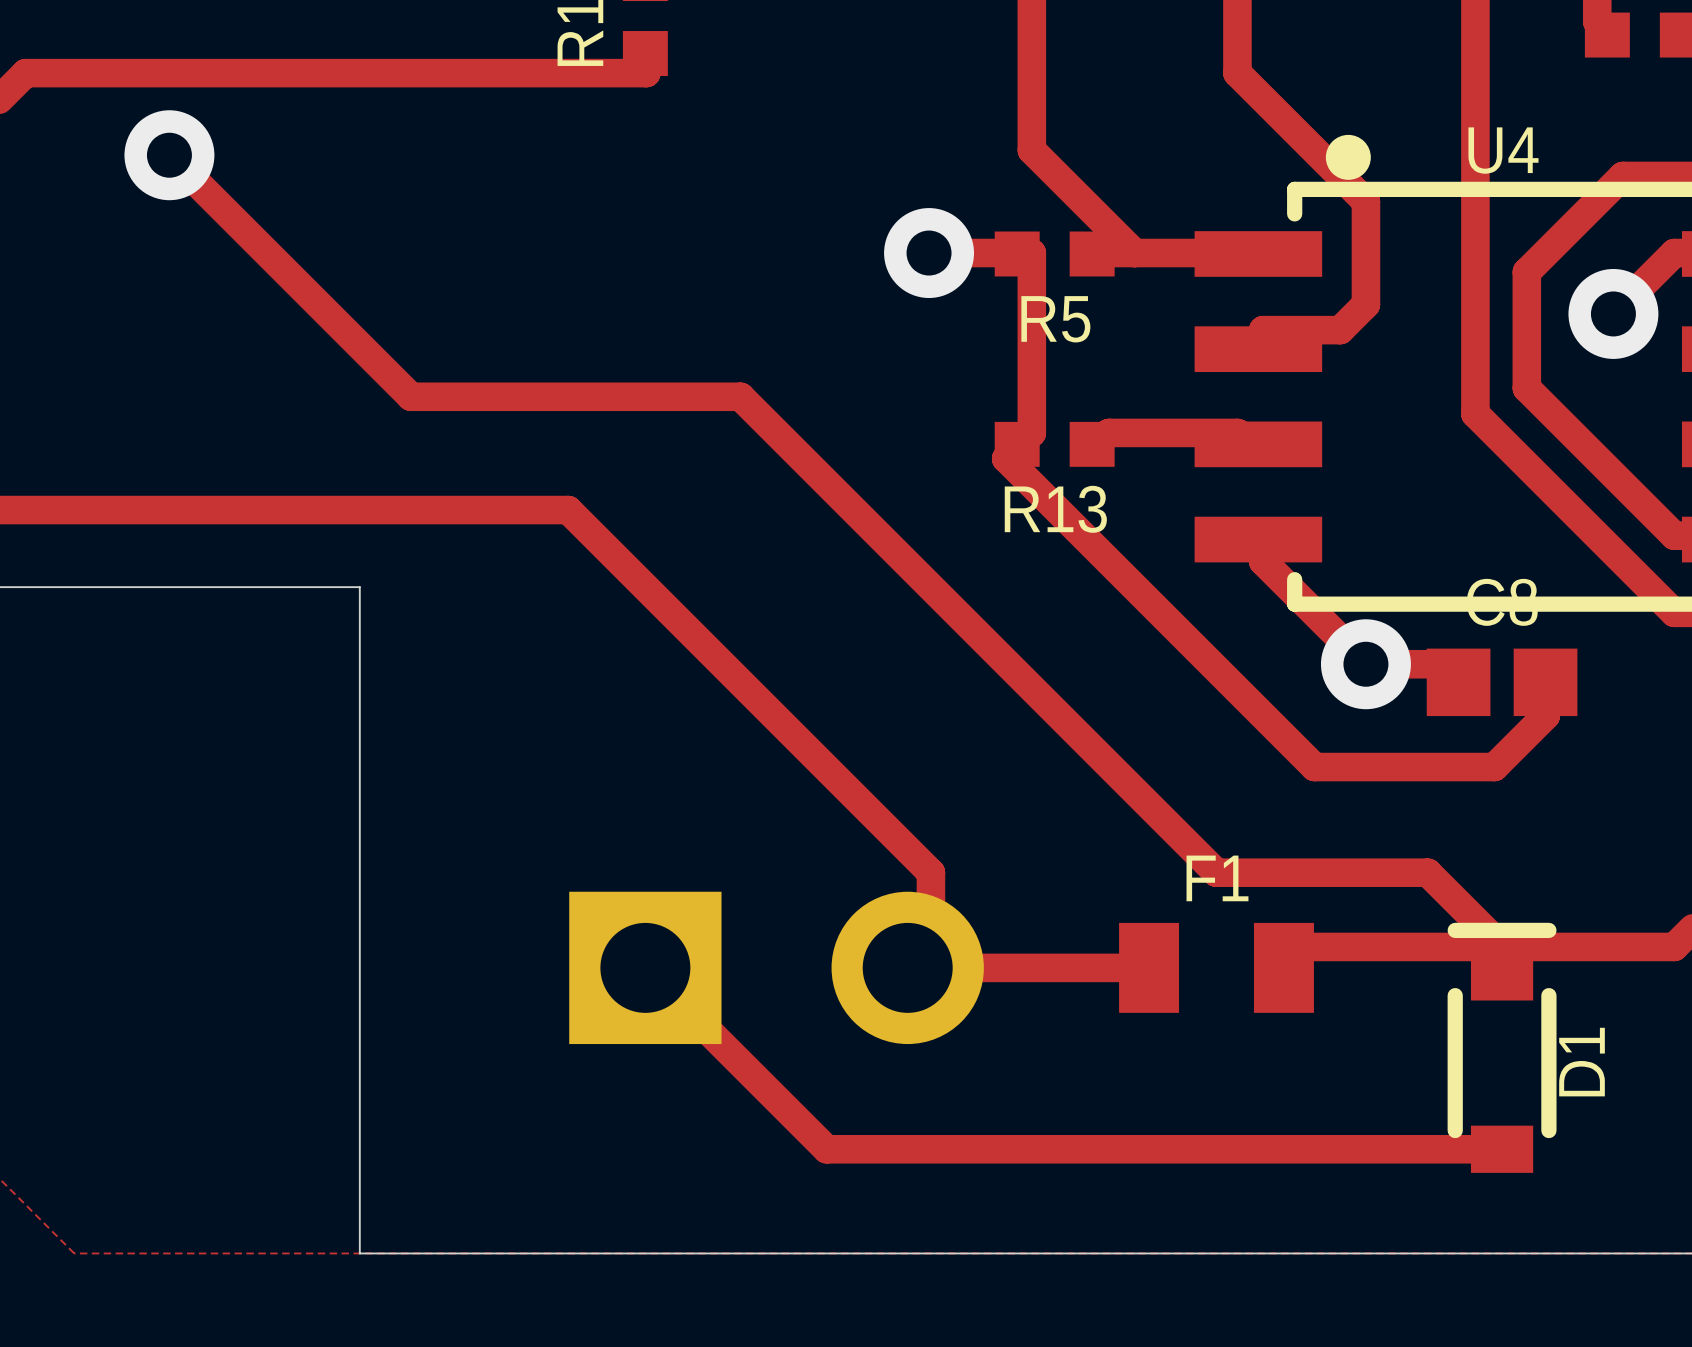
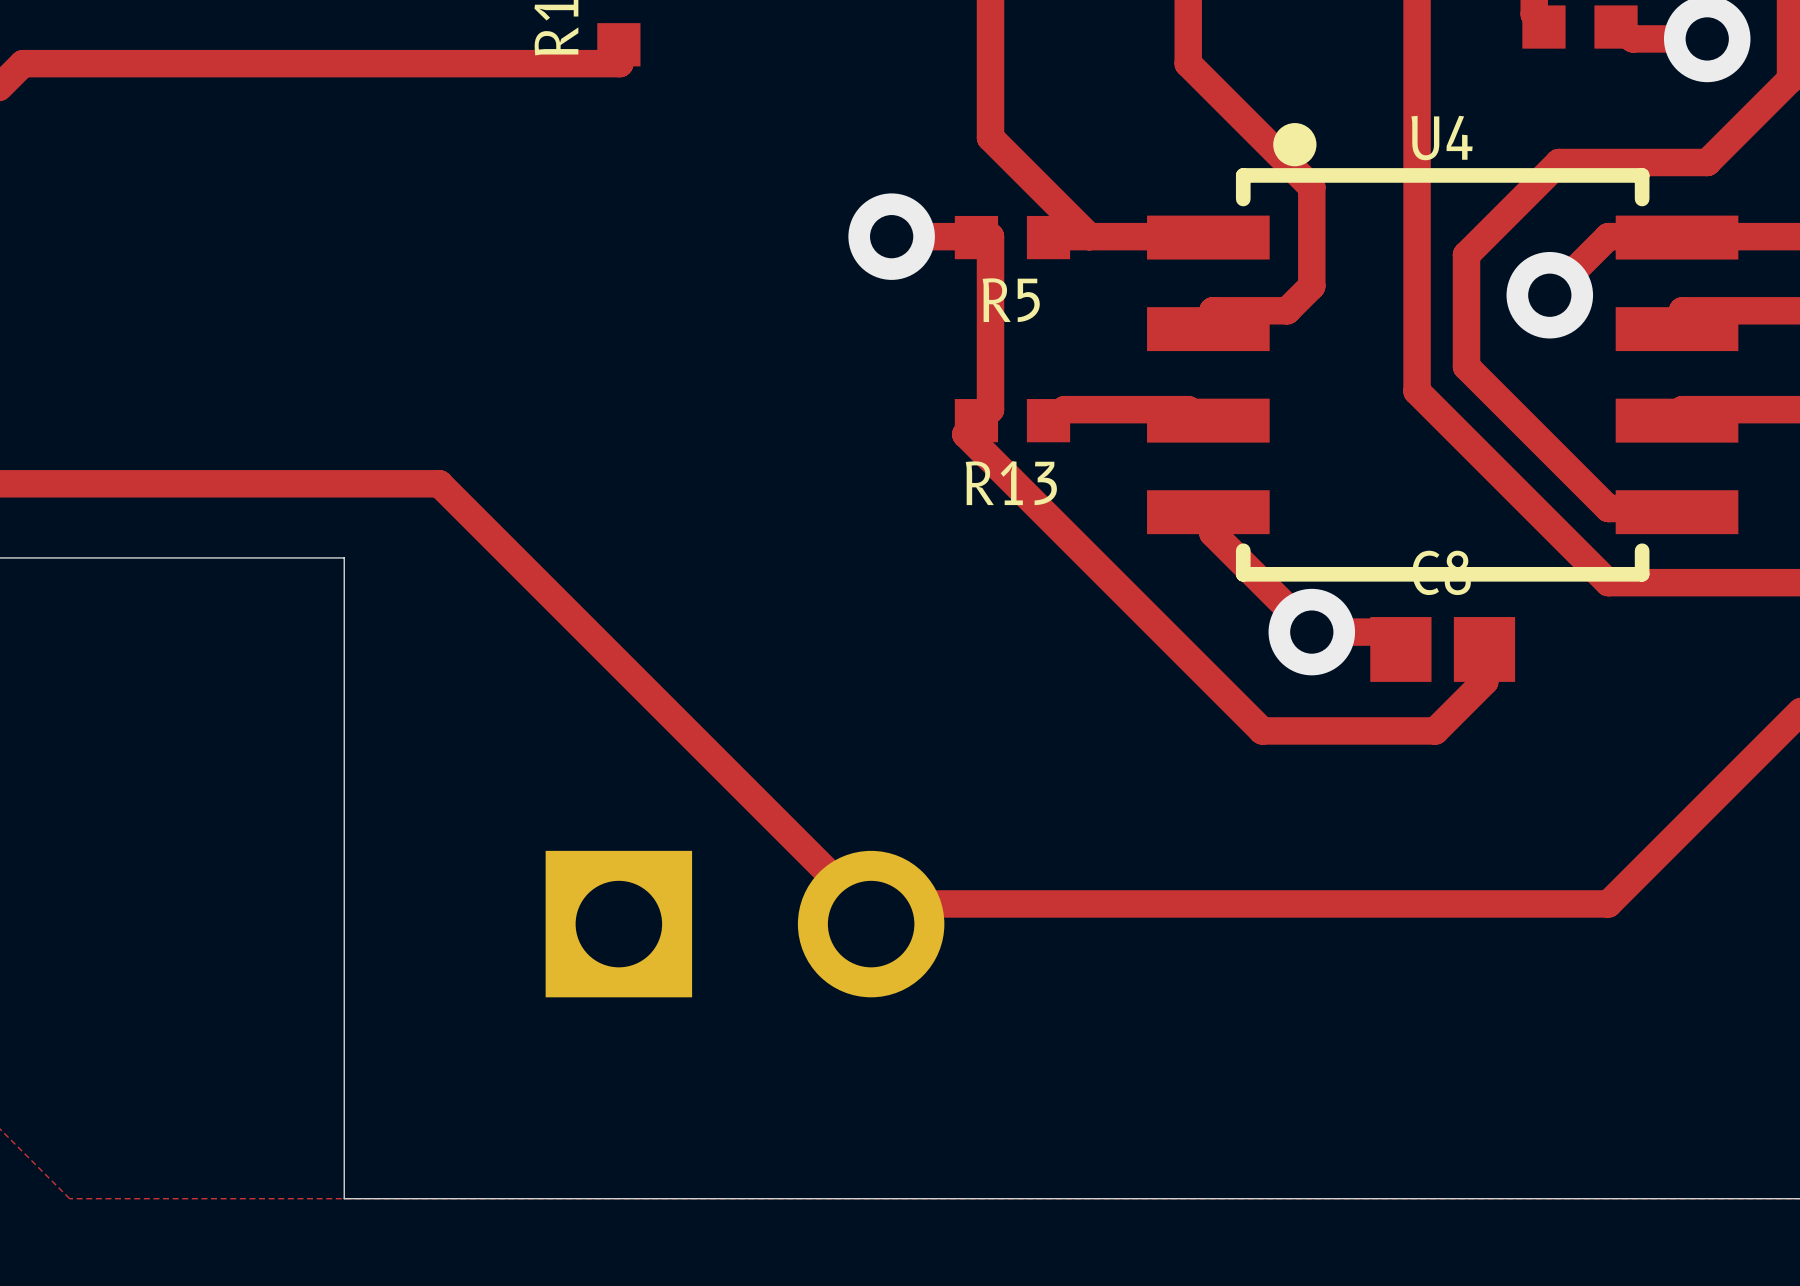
track: (169, 155) (410, 396) (740, 396) (1216, 872) (1427, 872) (1502, 946) (1502, 976) -> none
via: (169, 155) -> none
track: (458, 510) (568, 510) (930, 872) (930, 967) -> (439, 483) (871, 915) (871, 924) (884, 903) (1253, 903)
track: (645, 967) (826, 1149) (1502, 1149) -> none
track: (907, 967) (1149, 967) -> none
F1: (1216, 967) -> none
D1: (1502, 1047) -> none

